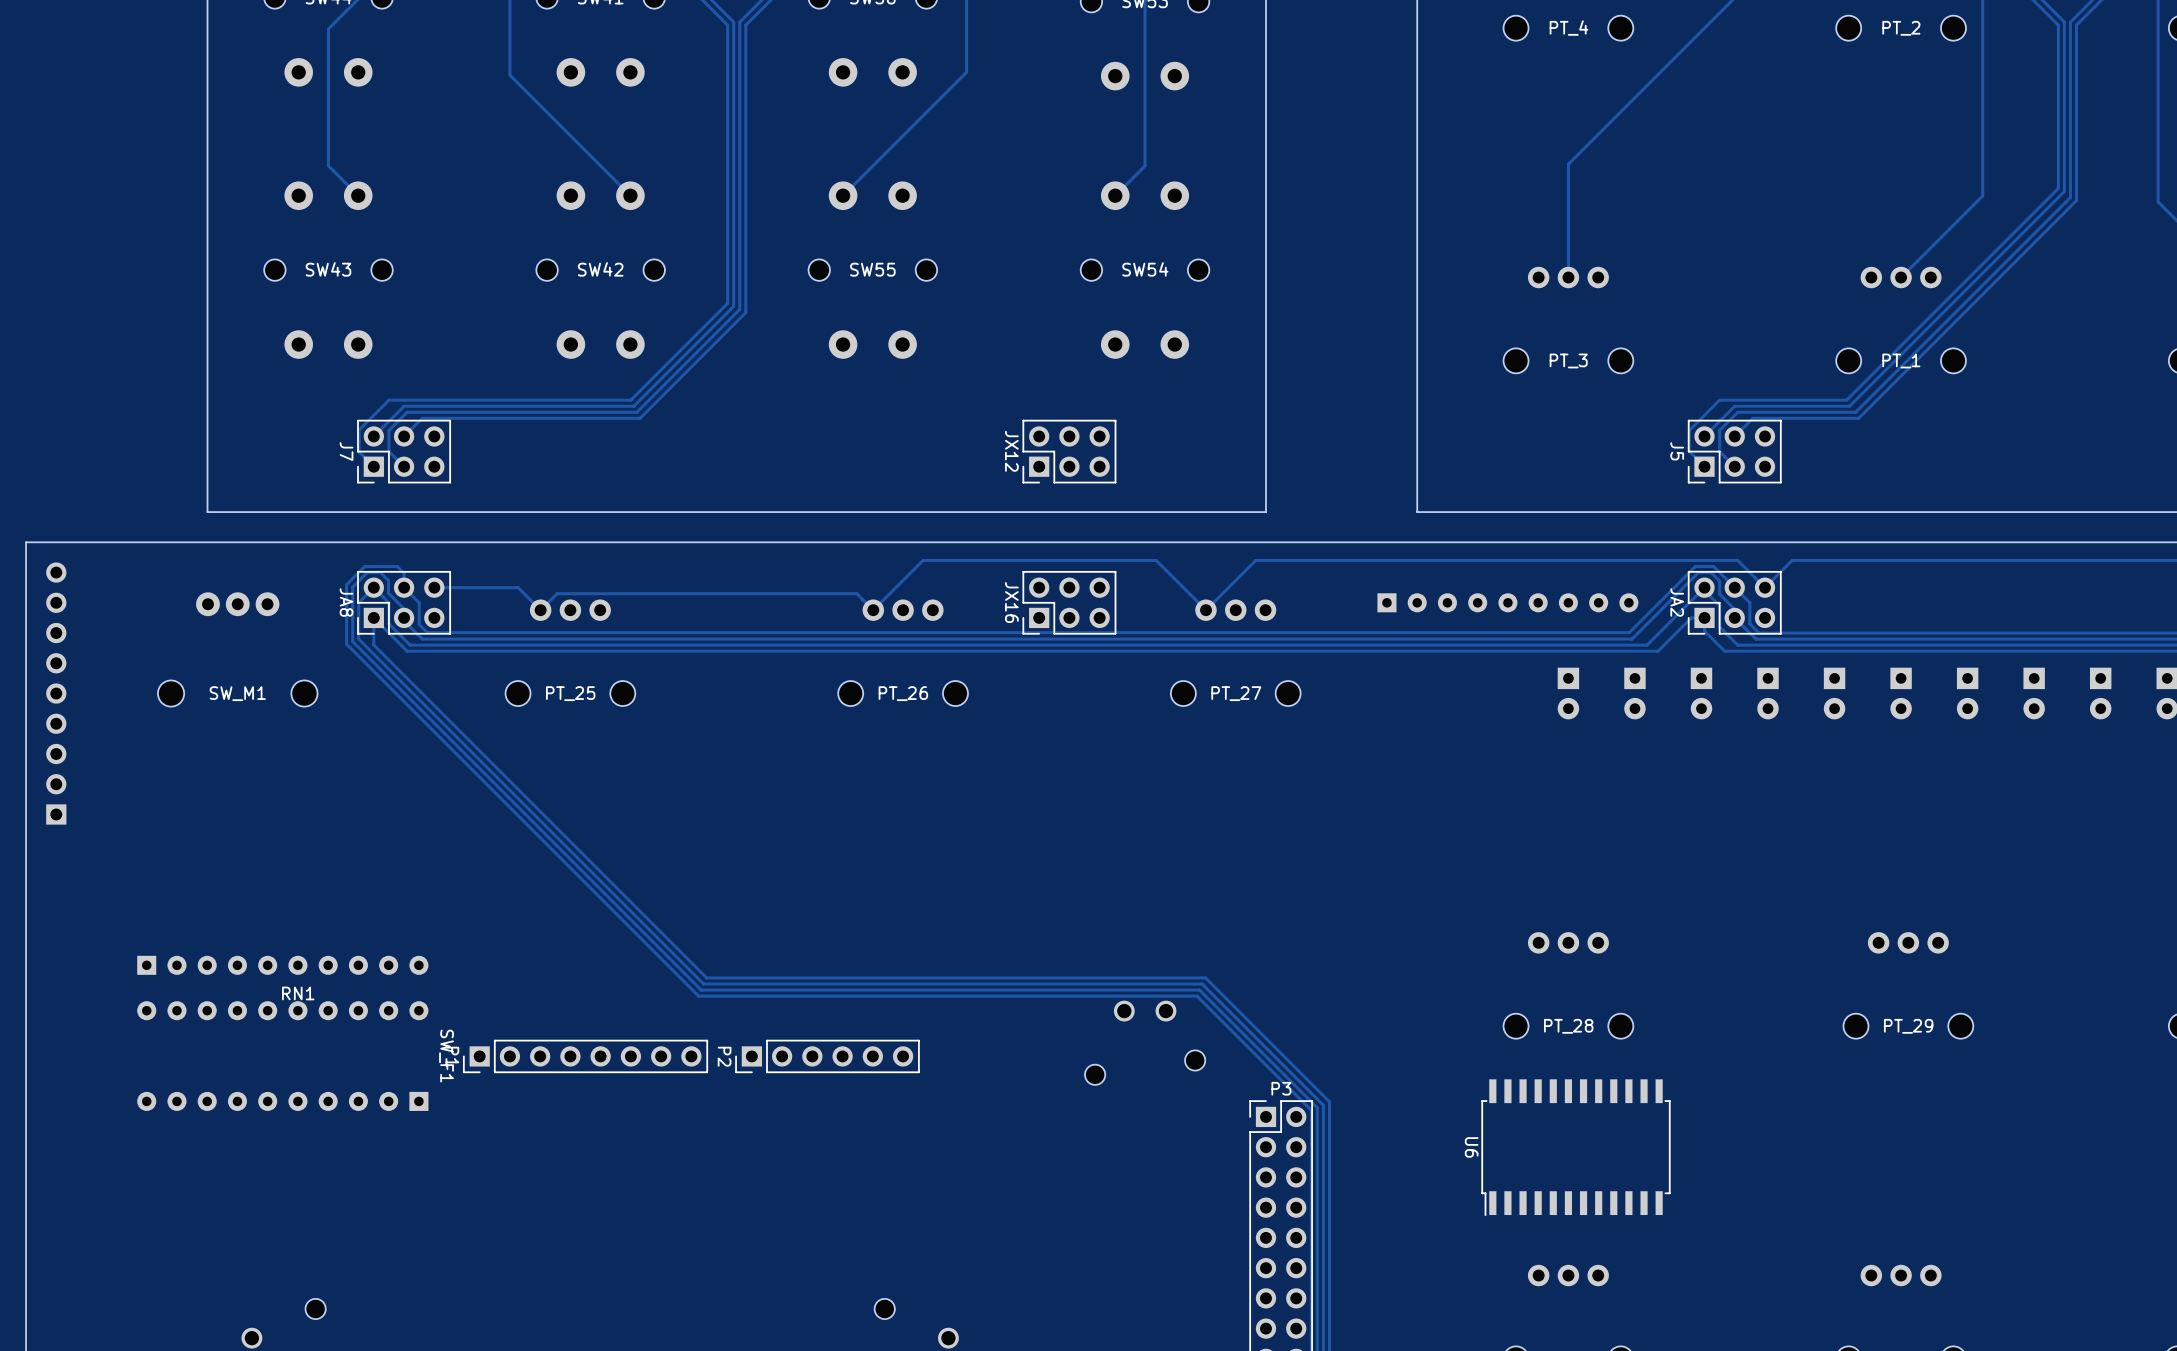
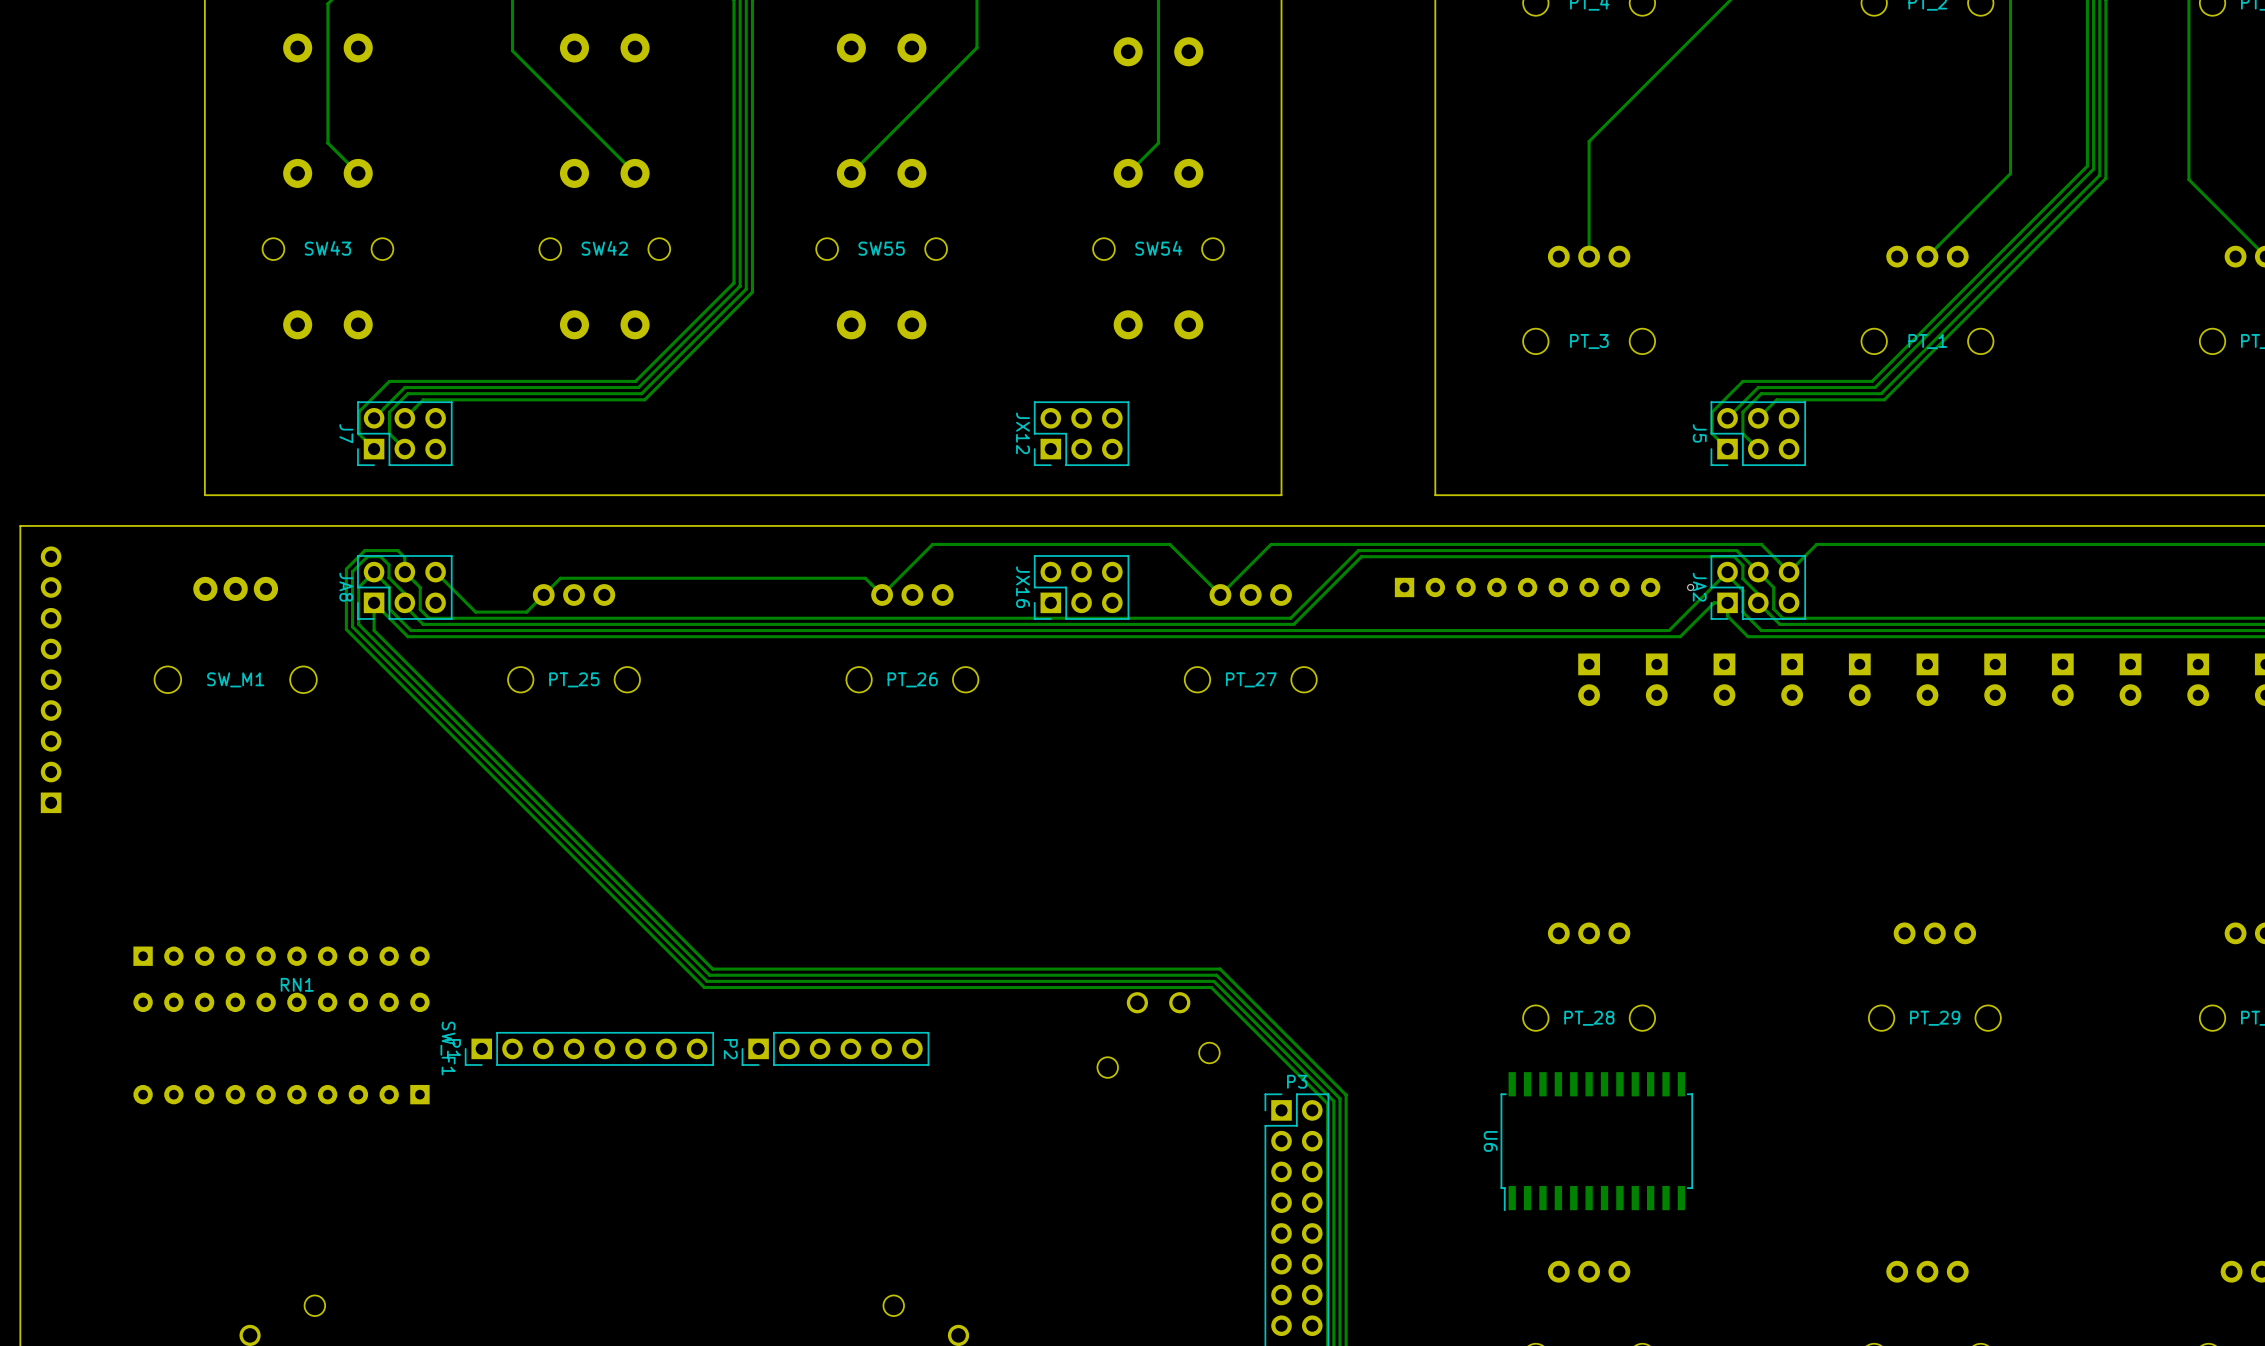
track: (1695, 566) (1629, 632) (427, 632) -> (1718, 550) (1358, 550) (1290, 618) (428, 617)
track: (1698, 572) (1631, 639) (1278, 639) -> (1721, 556) (1361, 556) (1293, 624)
track: (434, 587) (518, 587) (540, 610) -> (435, 572) (475, 612) (526, 612) (543, 594)
via: none -> (1690, 587)

